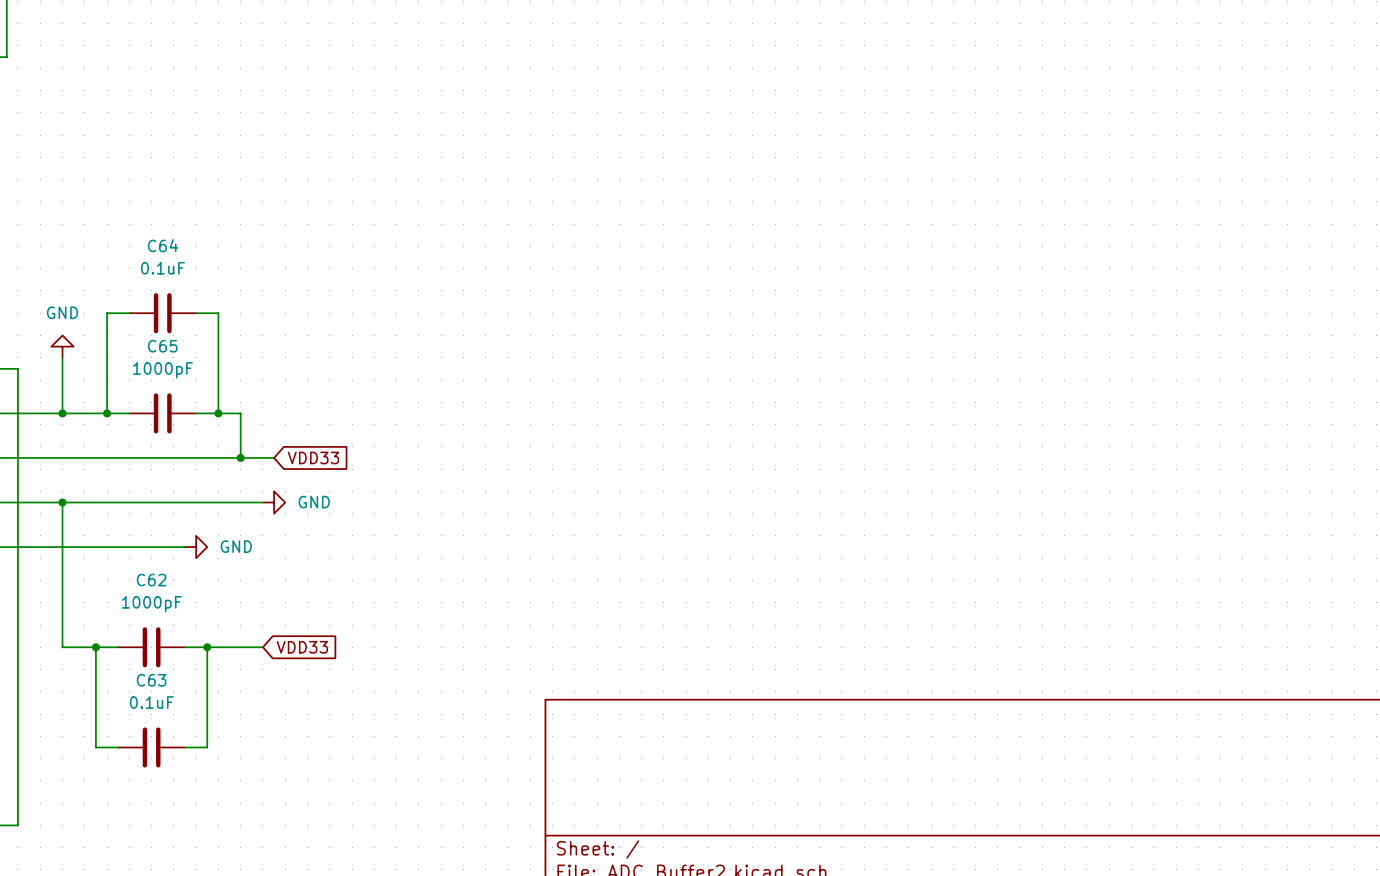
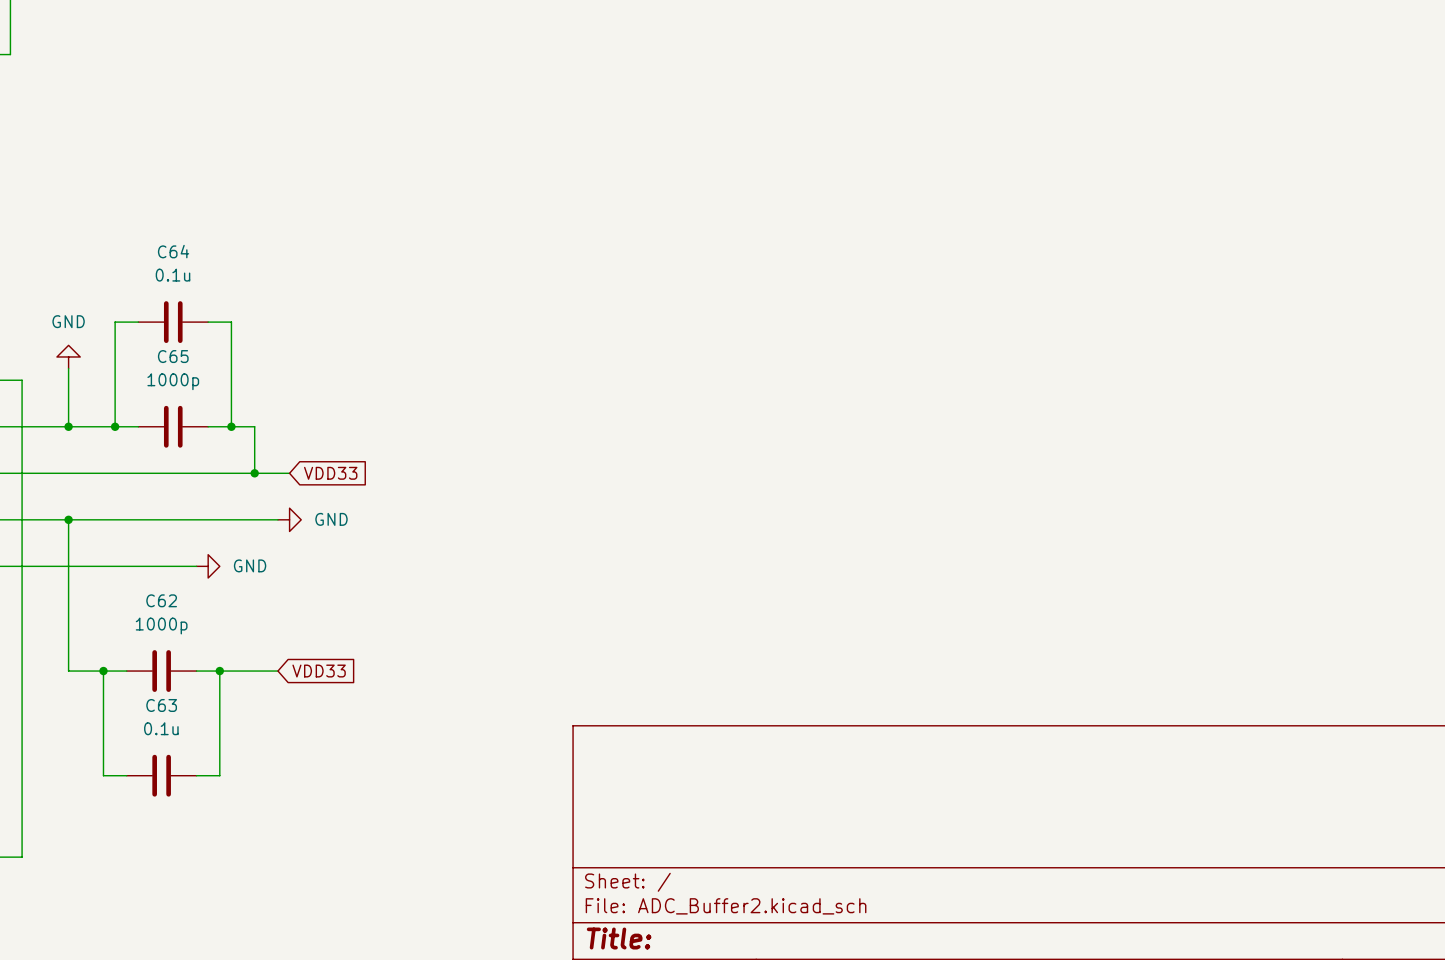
C64 value: 0.1uF (162, 268) -> 0.1u (172, 275)
C65 value: 1000pF (162, 370) -> 1000p (173, 381)
C62 value: 1000pF (151, 604) -> 1000p (161, 626)
C63 value: 0.1uF (151, 702) -> 0.1u (161, 728)

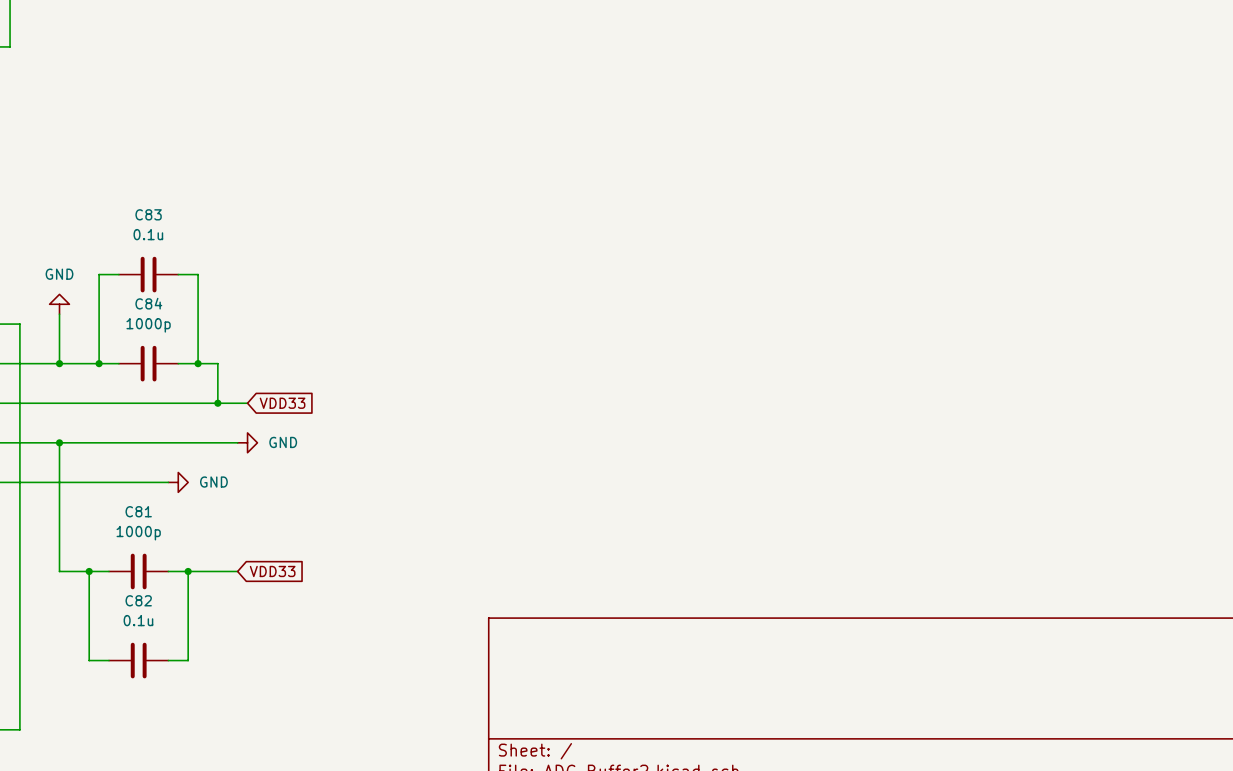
C64 name: C64 (173, 251) -> C83 (148, 214)
C65 name: C65 (173, 356) -> C84 (148, 303)
C62 name: C62 (161, 600) -> C81 (138, 511)
C63 name: C63 (161, 705) -> C82 (138, 600)

